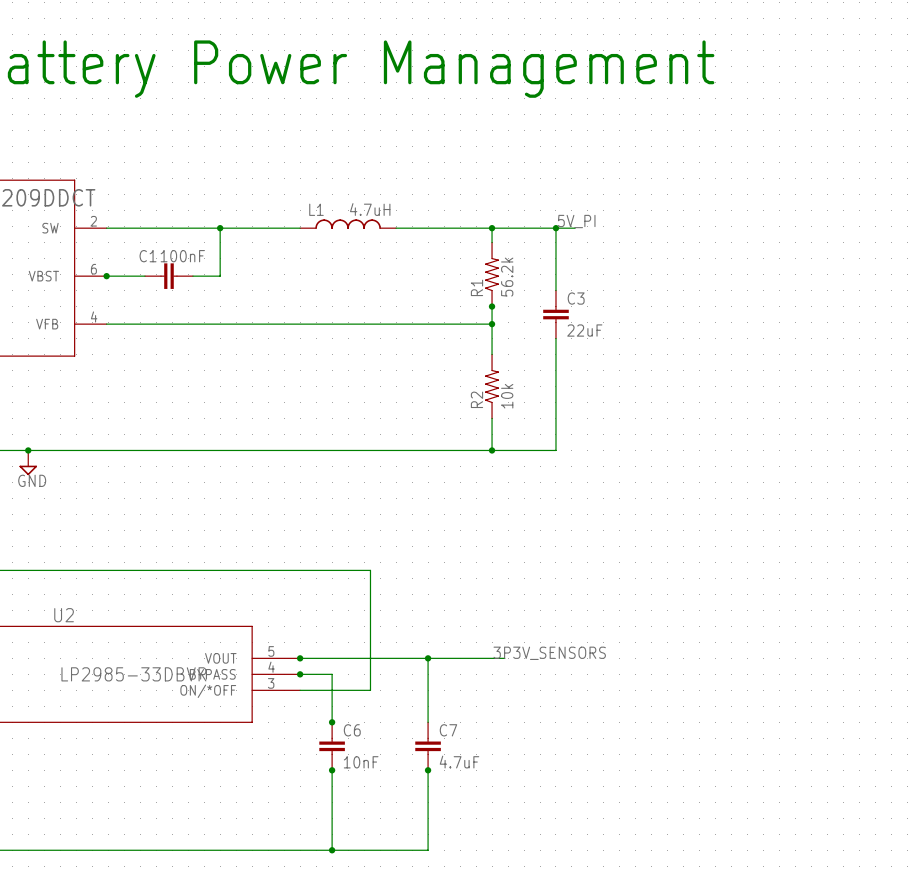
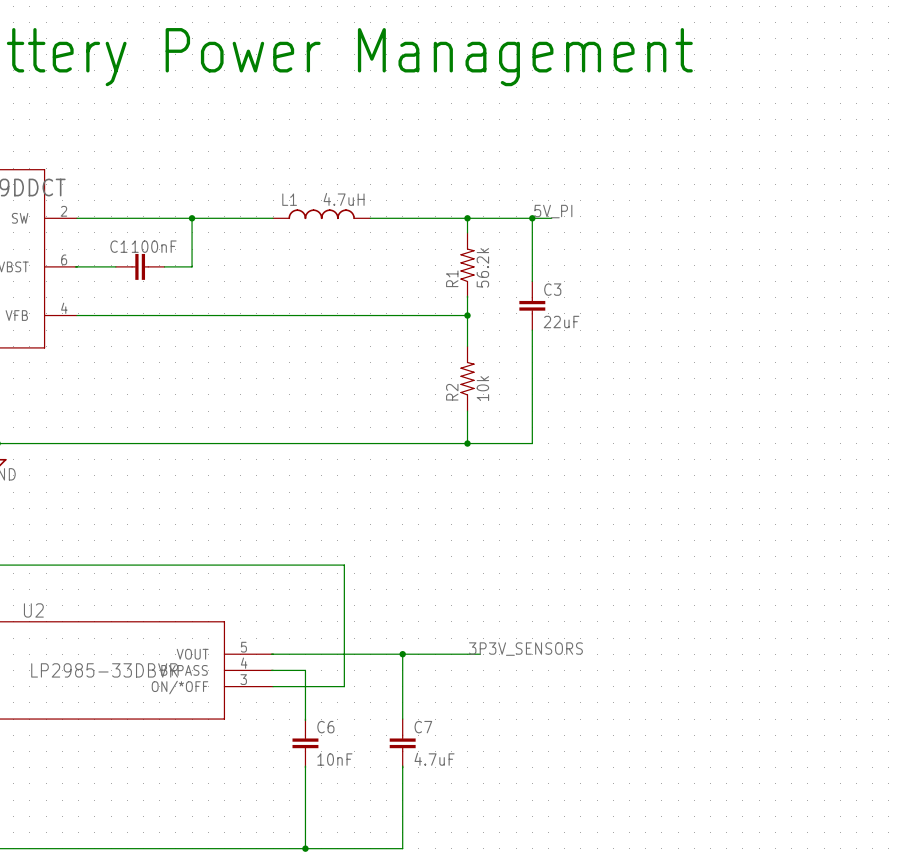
junction: (106, 276) -> none
junction: (492, 306) -> none
junction: (300, 658) -> none
junction: (300, 674) -> none
junction: (332, 722) -> none
junction: (332, 770) -> none
junction: (428, 770) -> none

